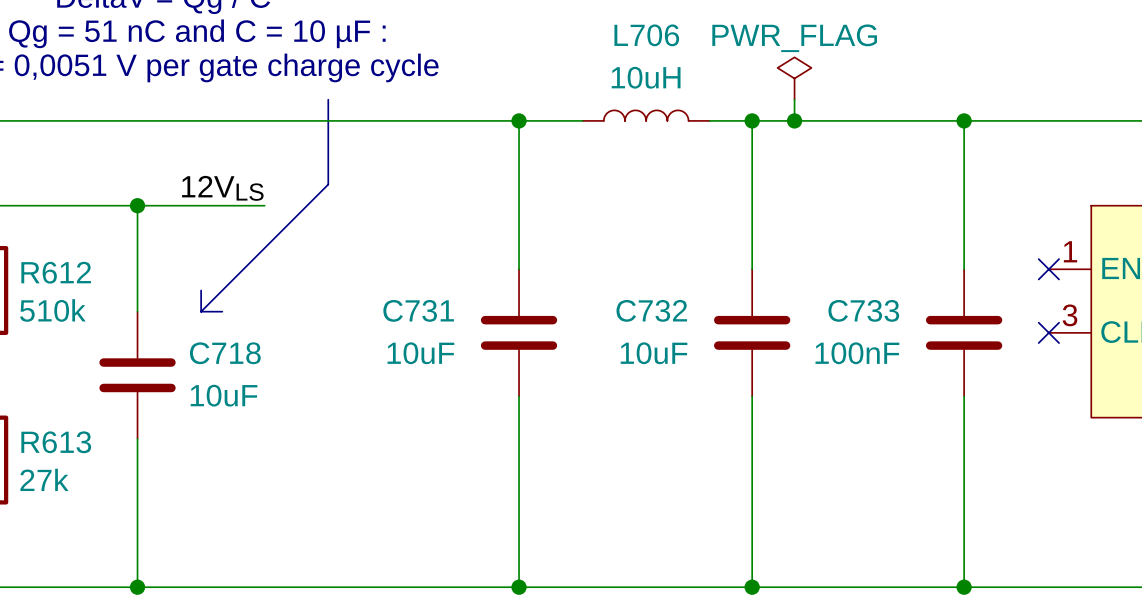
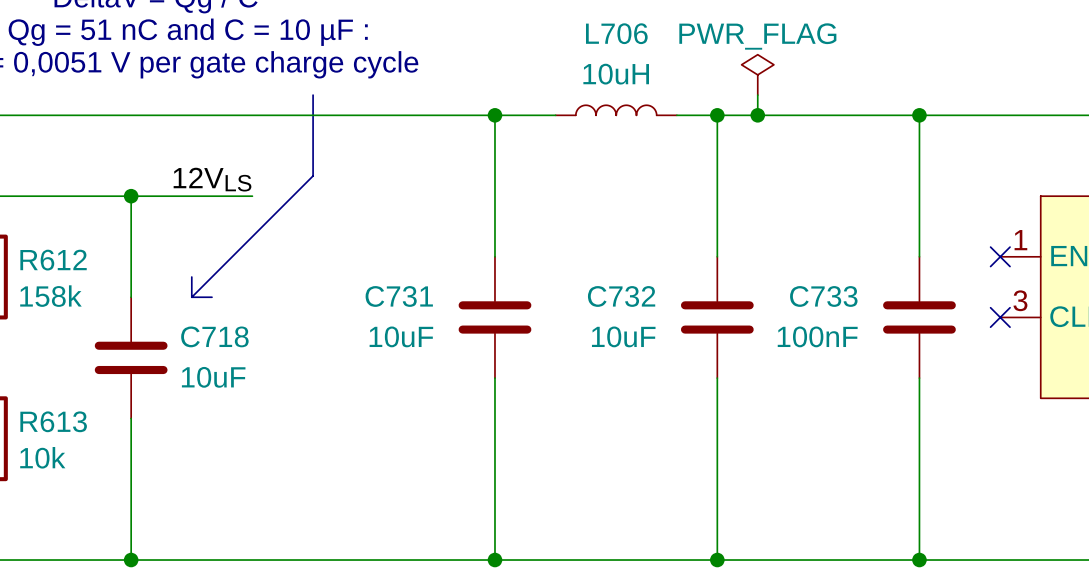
R612 value: 510k (52, 310) -> 158k (50, 296)
R613 value: 27k (44, 479) -> 10k (42, 457)

